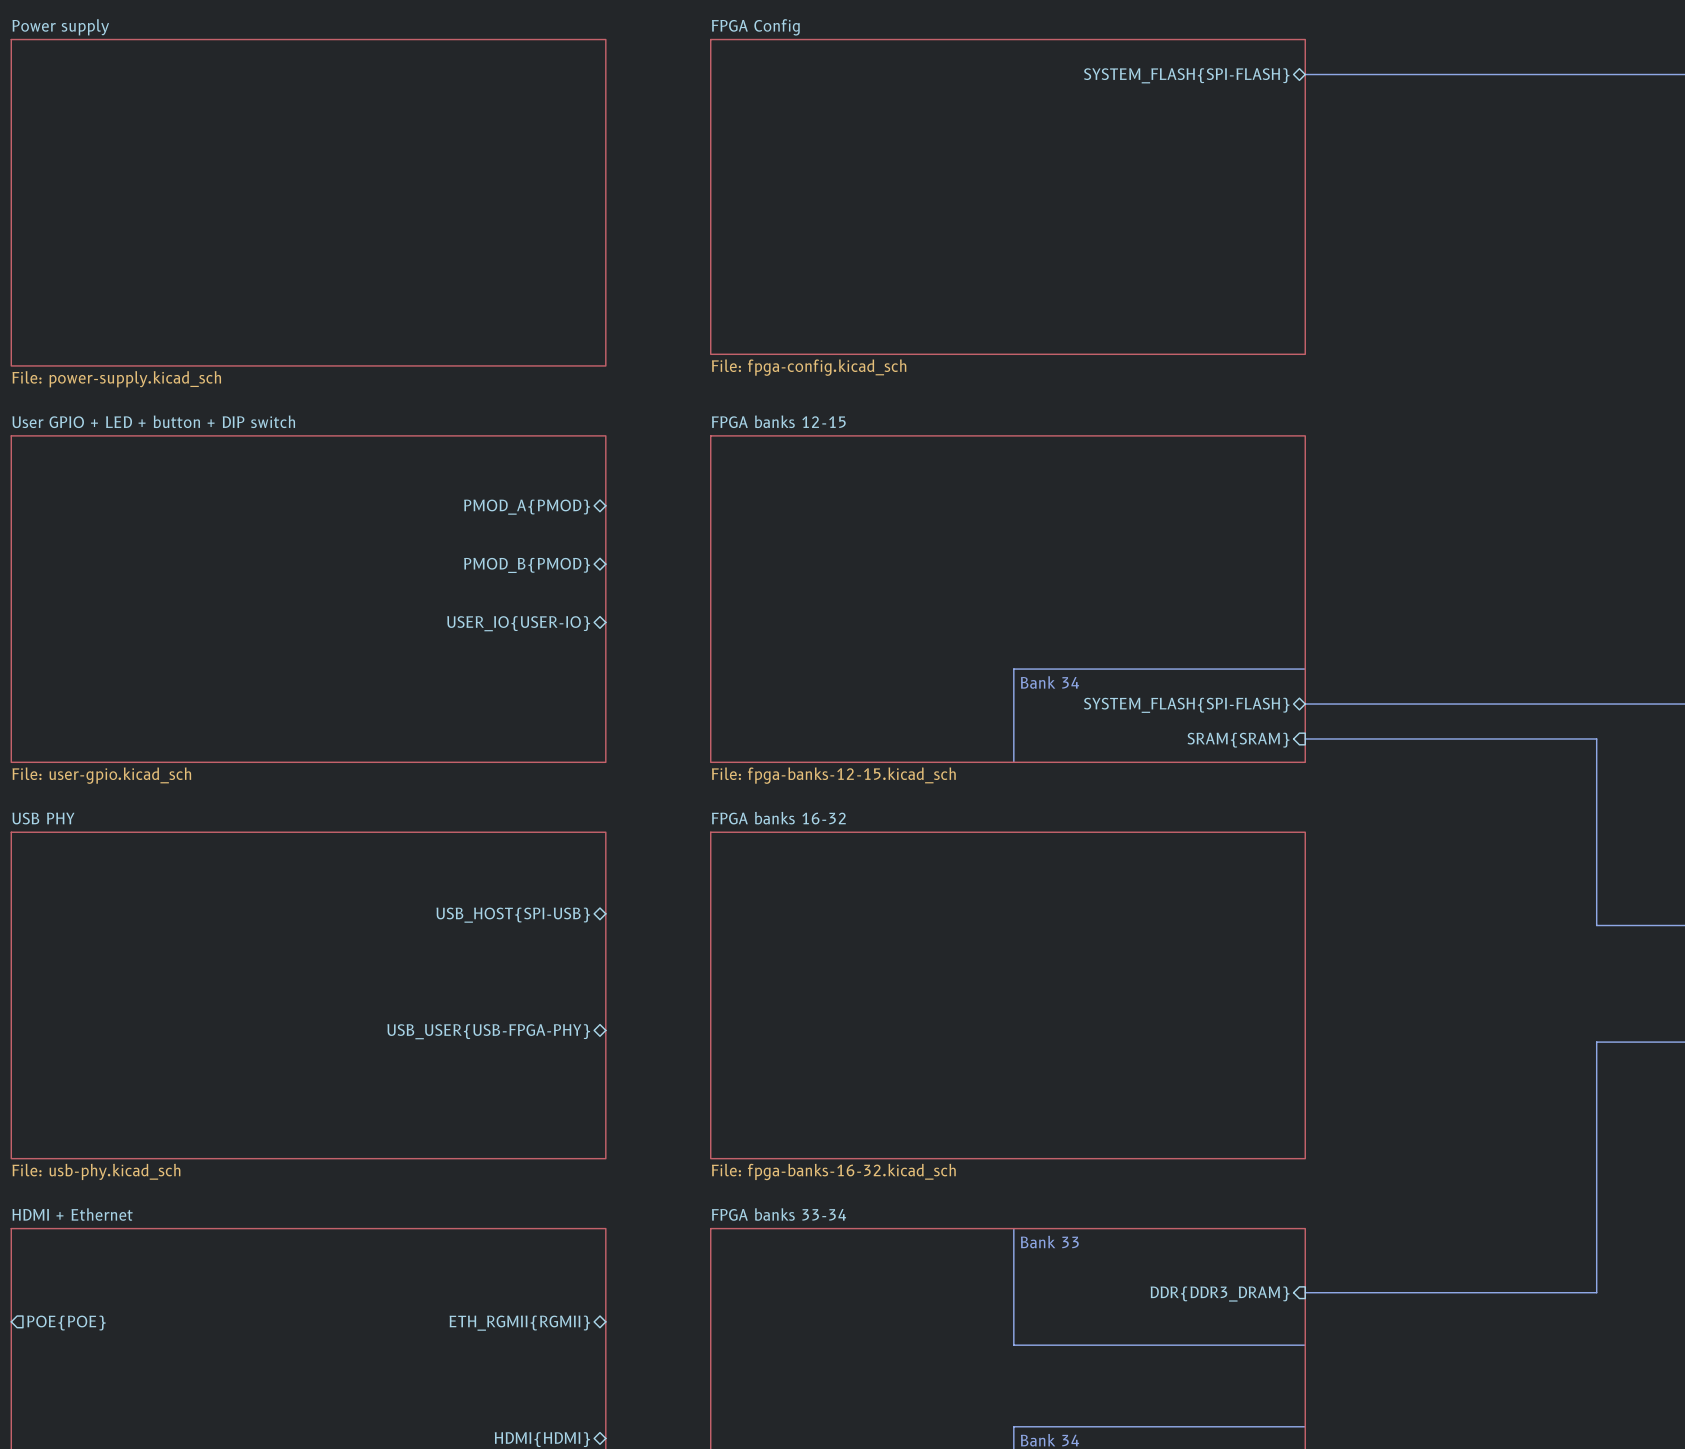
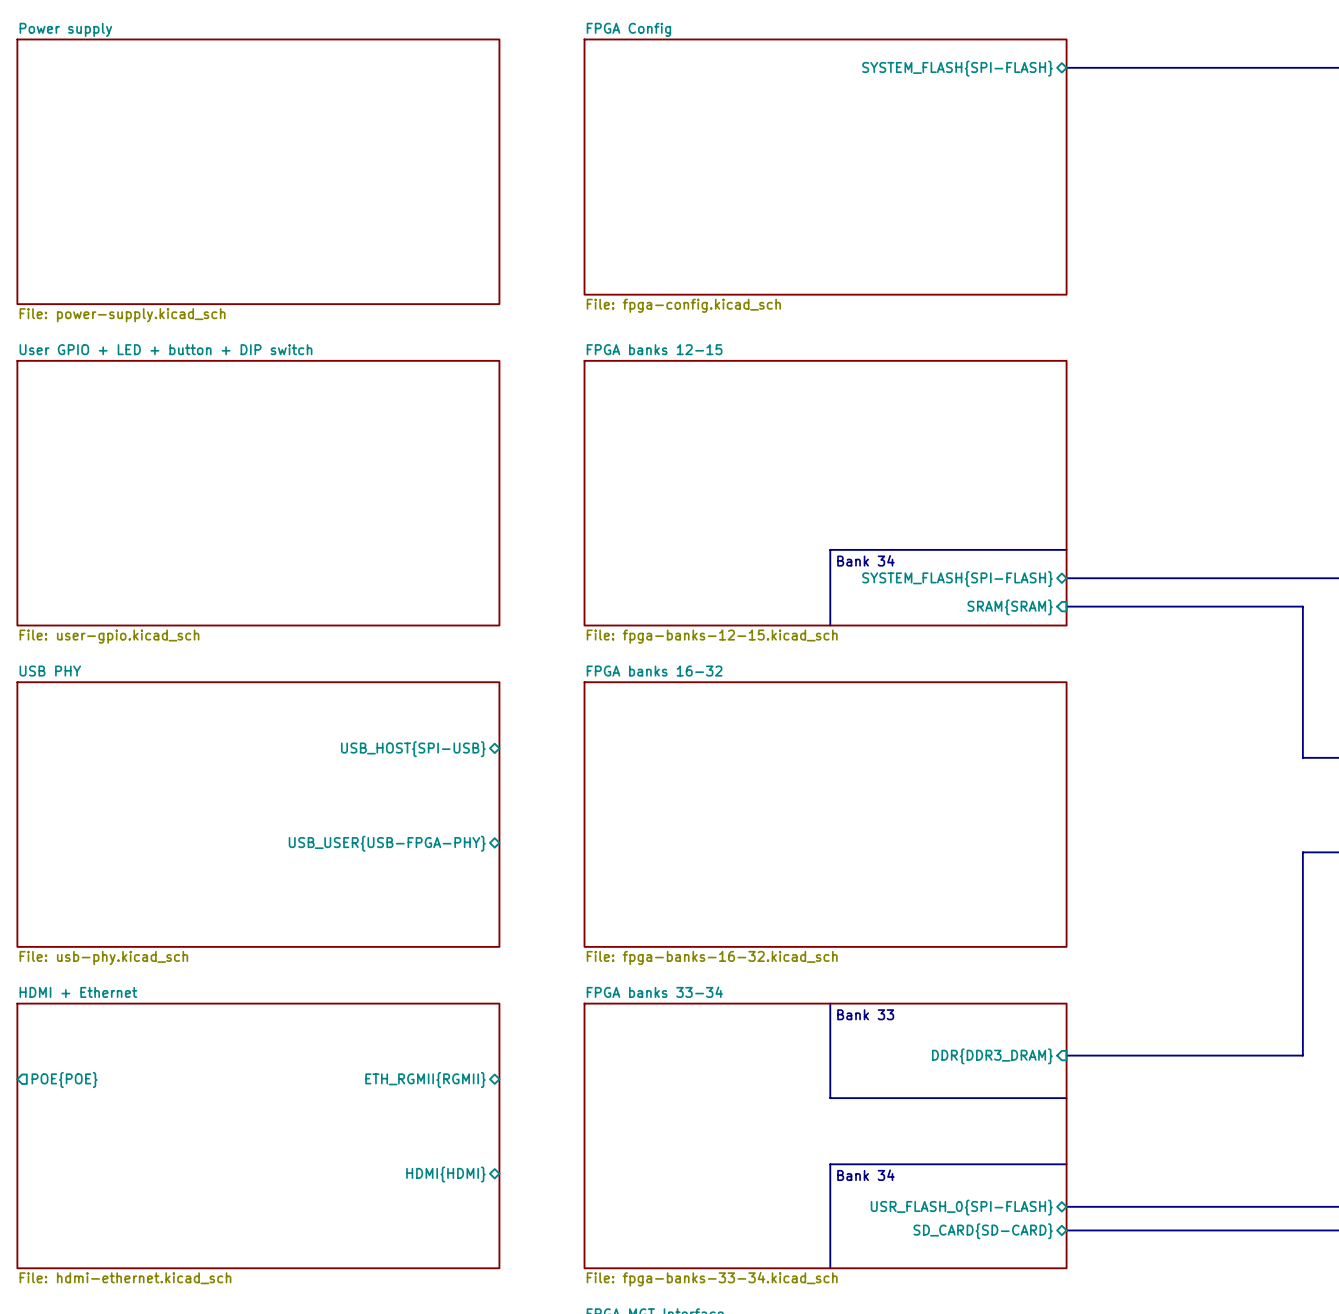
sheet pin: PMOD_A{PMOD} (527, 507) -> none
sheet pin: PMOD_B{PMOD} (527, 565) -> none
sheet pin: USER_IO{USER-IO} (518, 623) -> none

